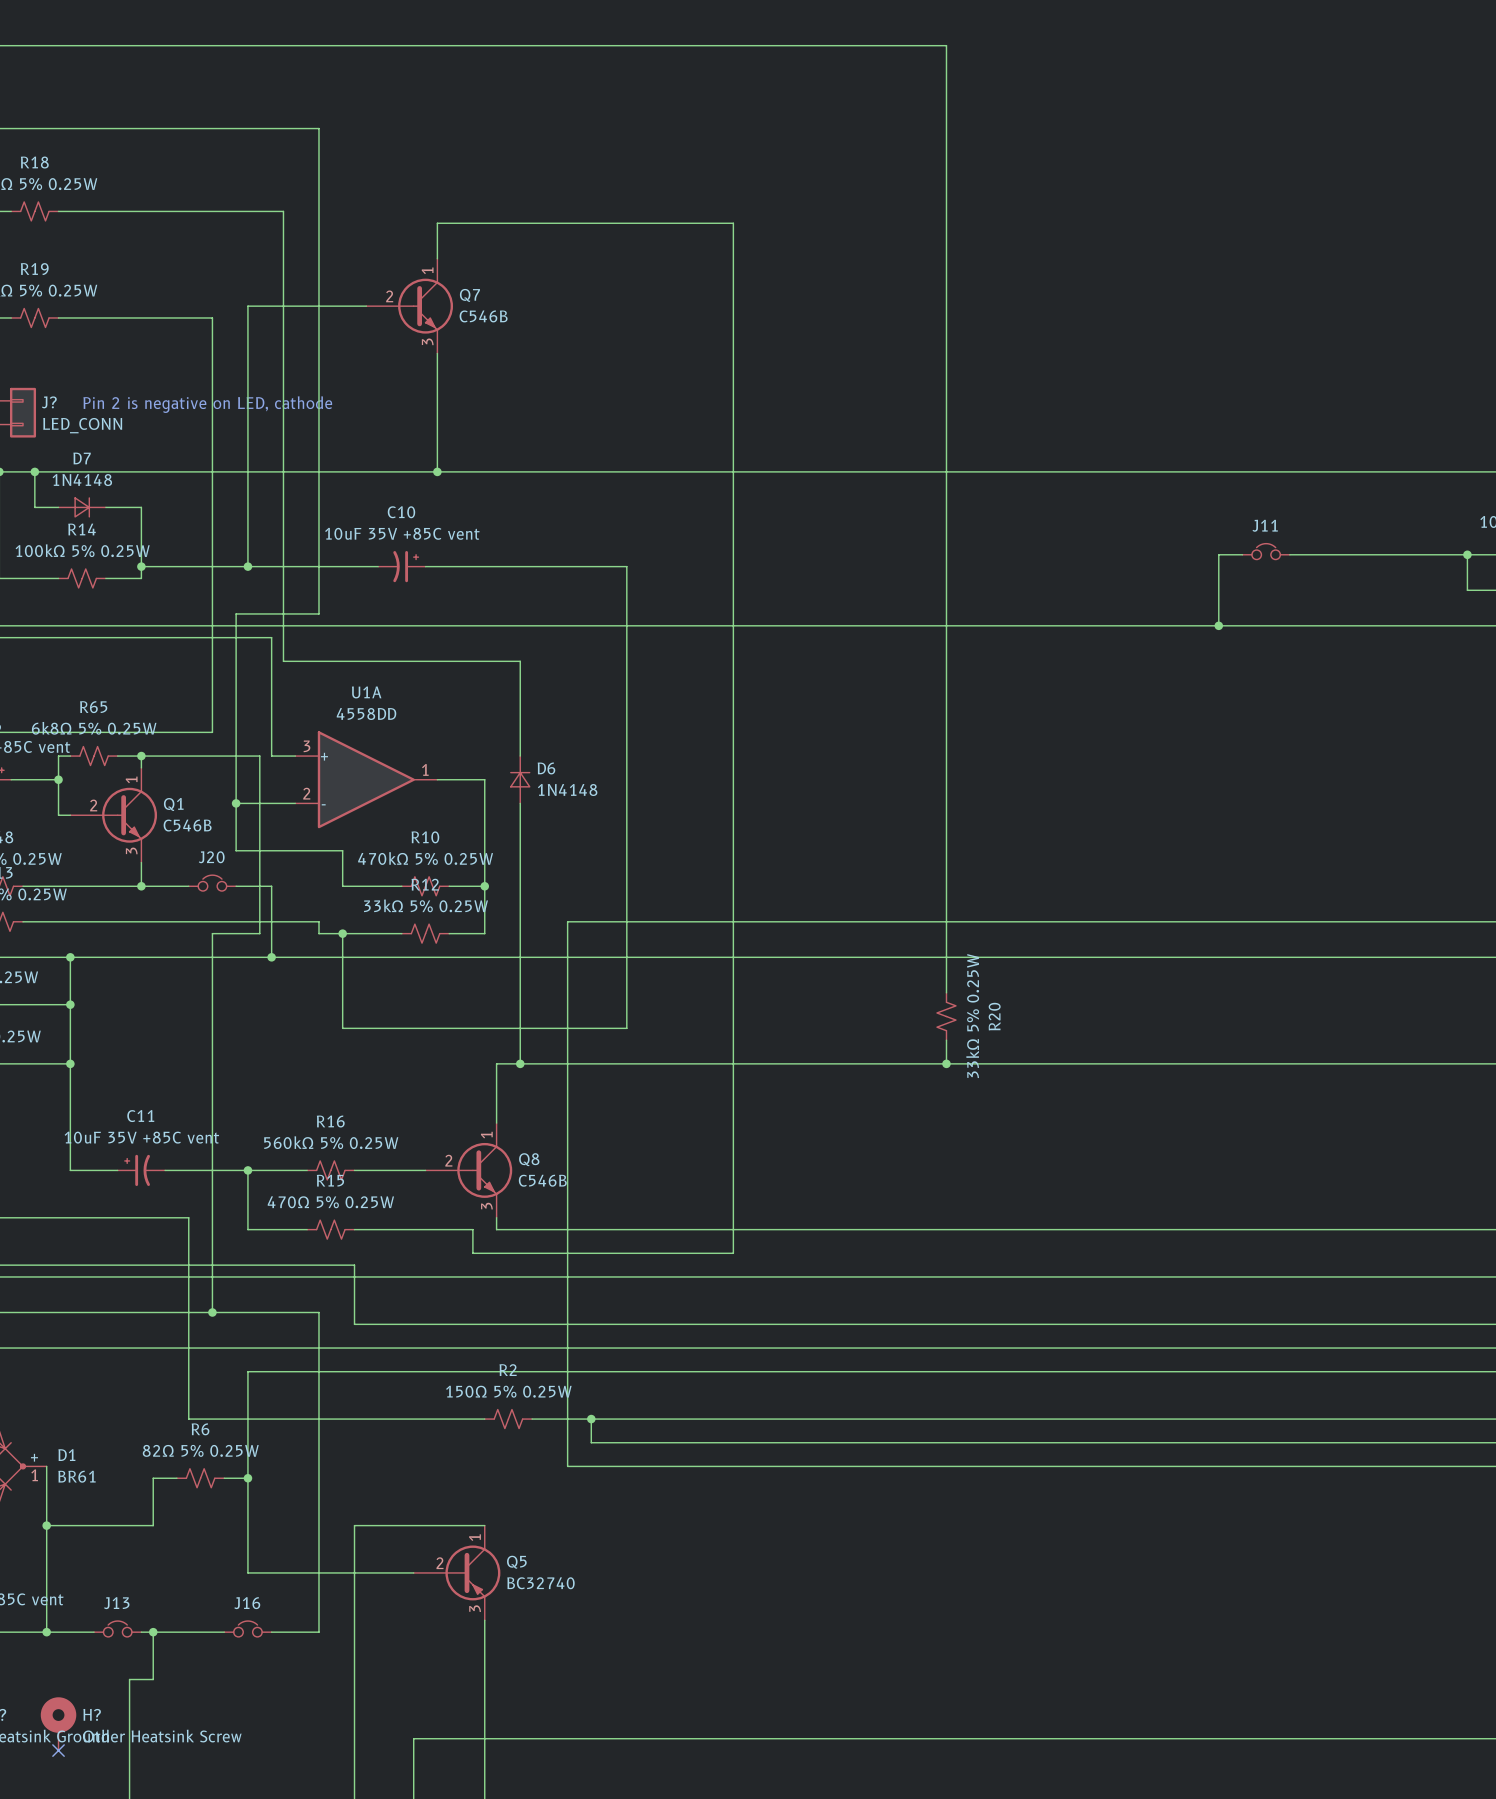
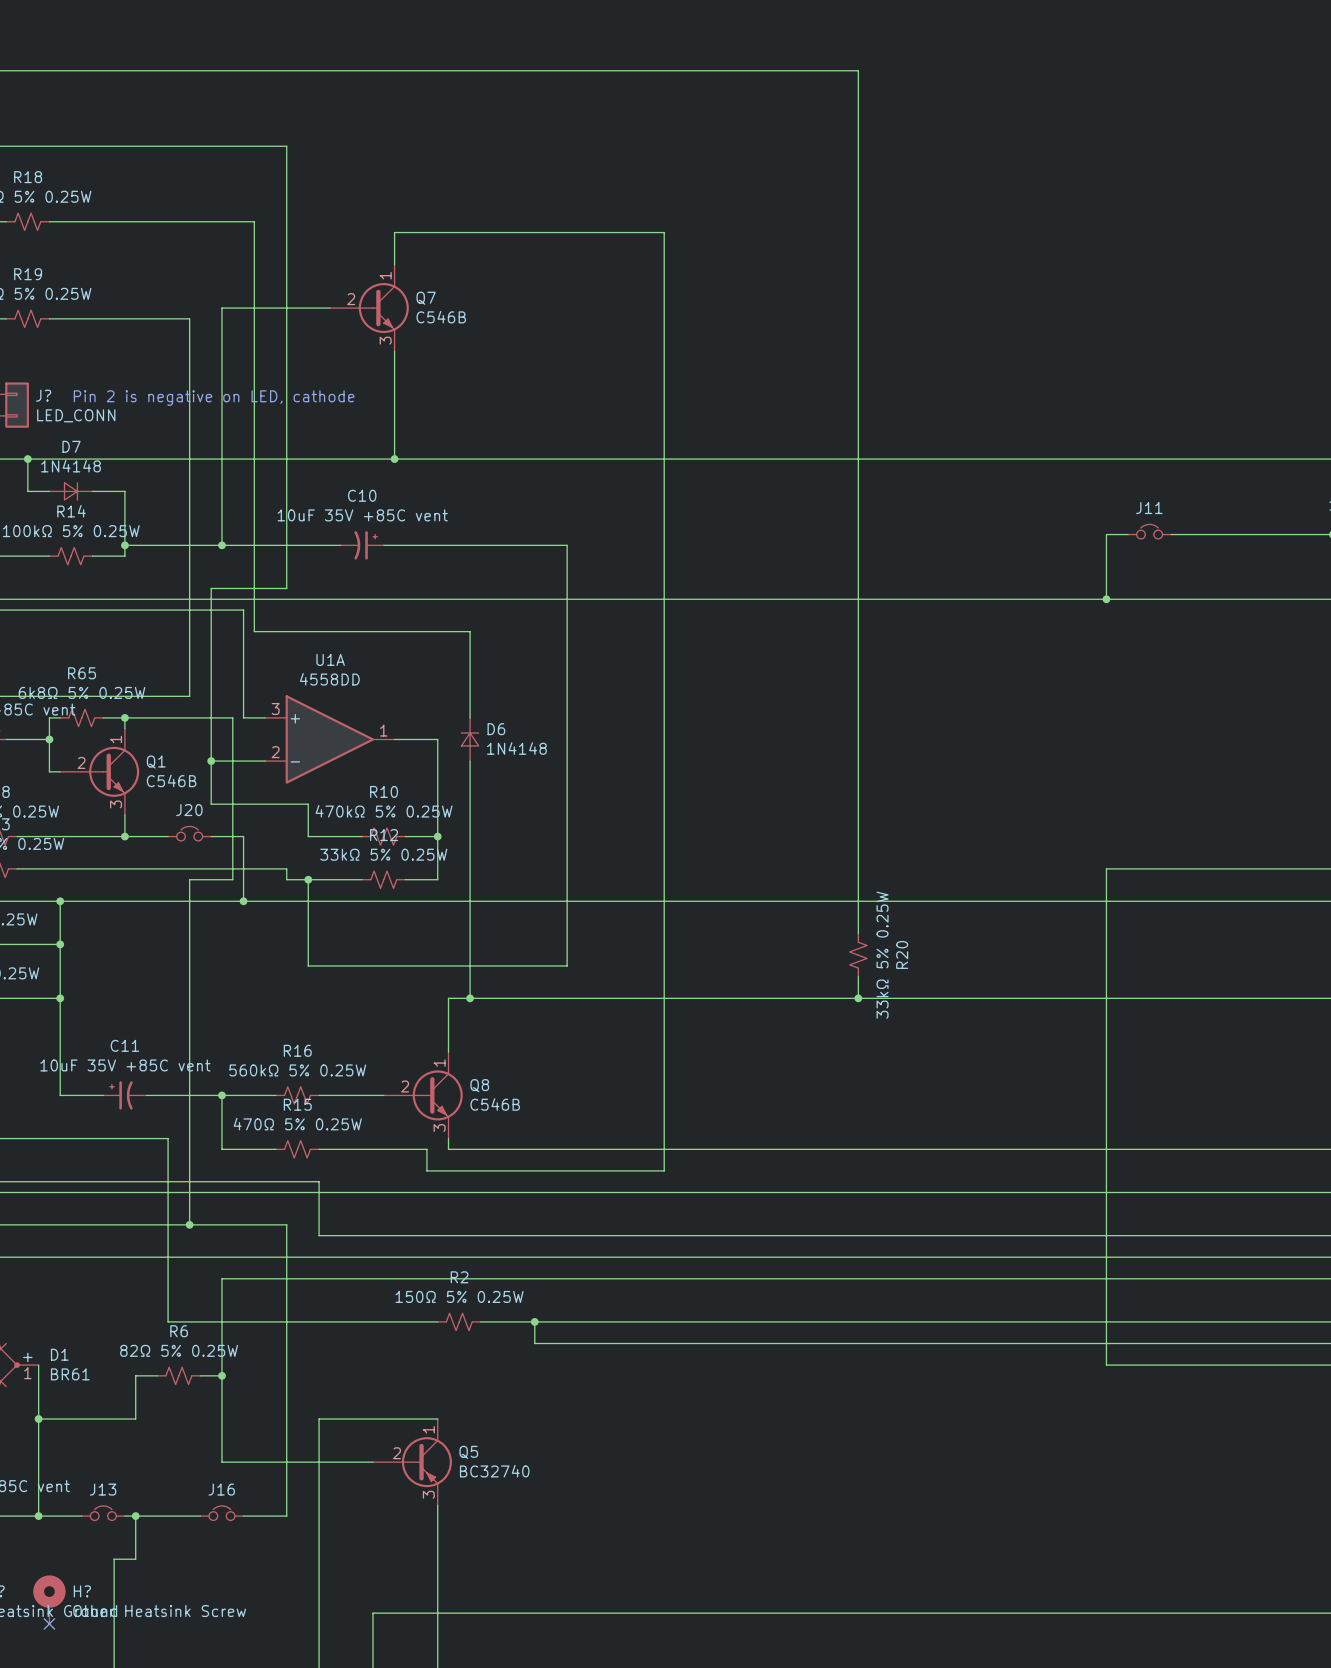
wire: (1218, 921) (567, 921) (567, 1466) (1218, 1466) -> (1106, 868) (1106, 1365)

